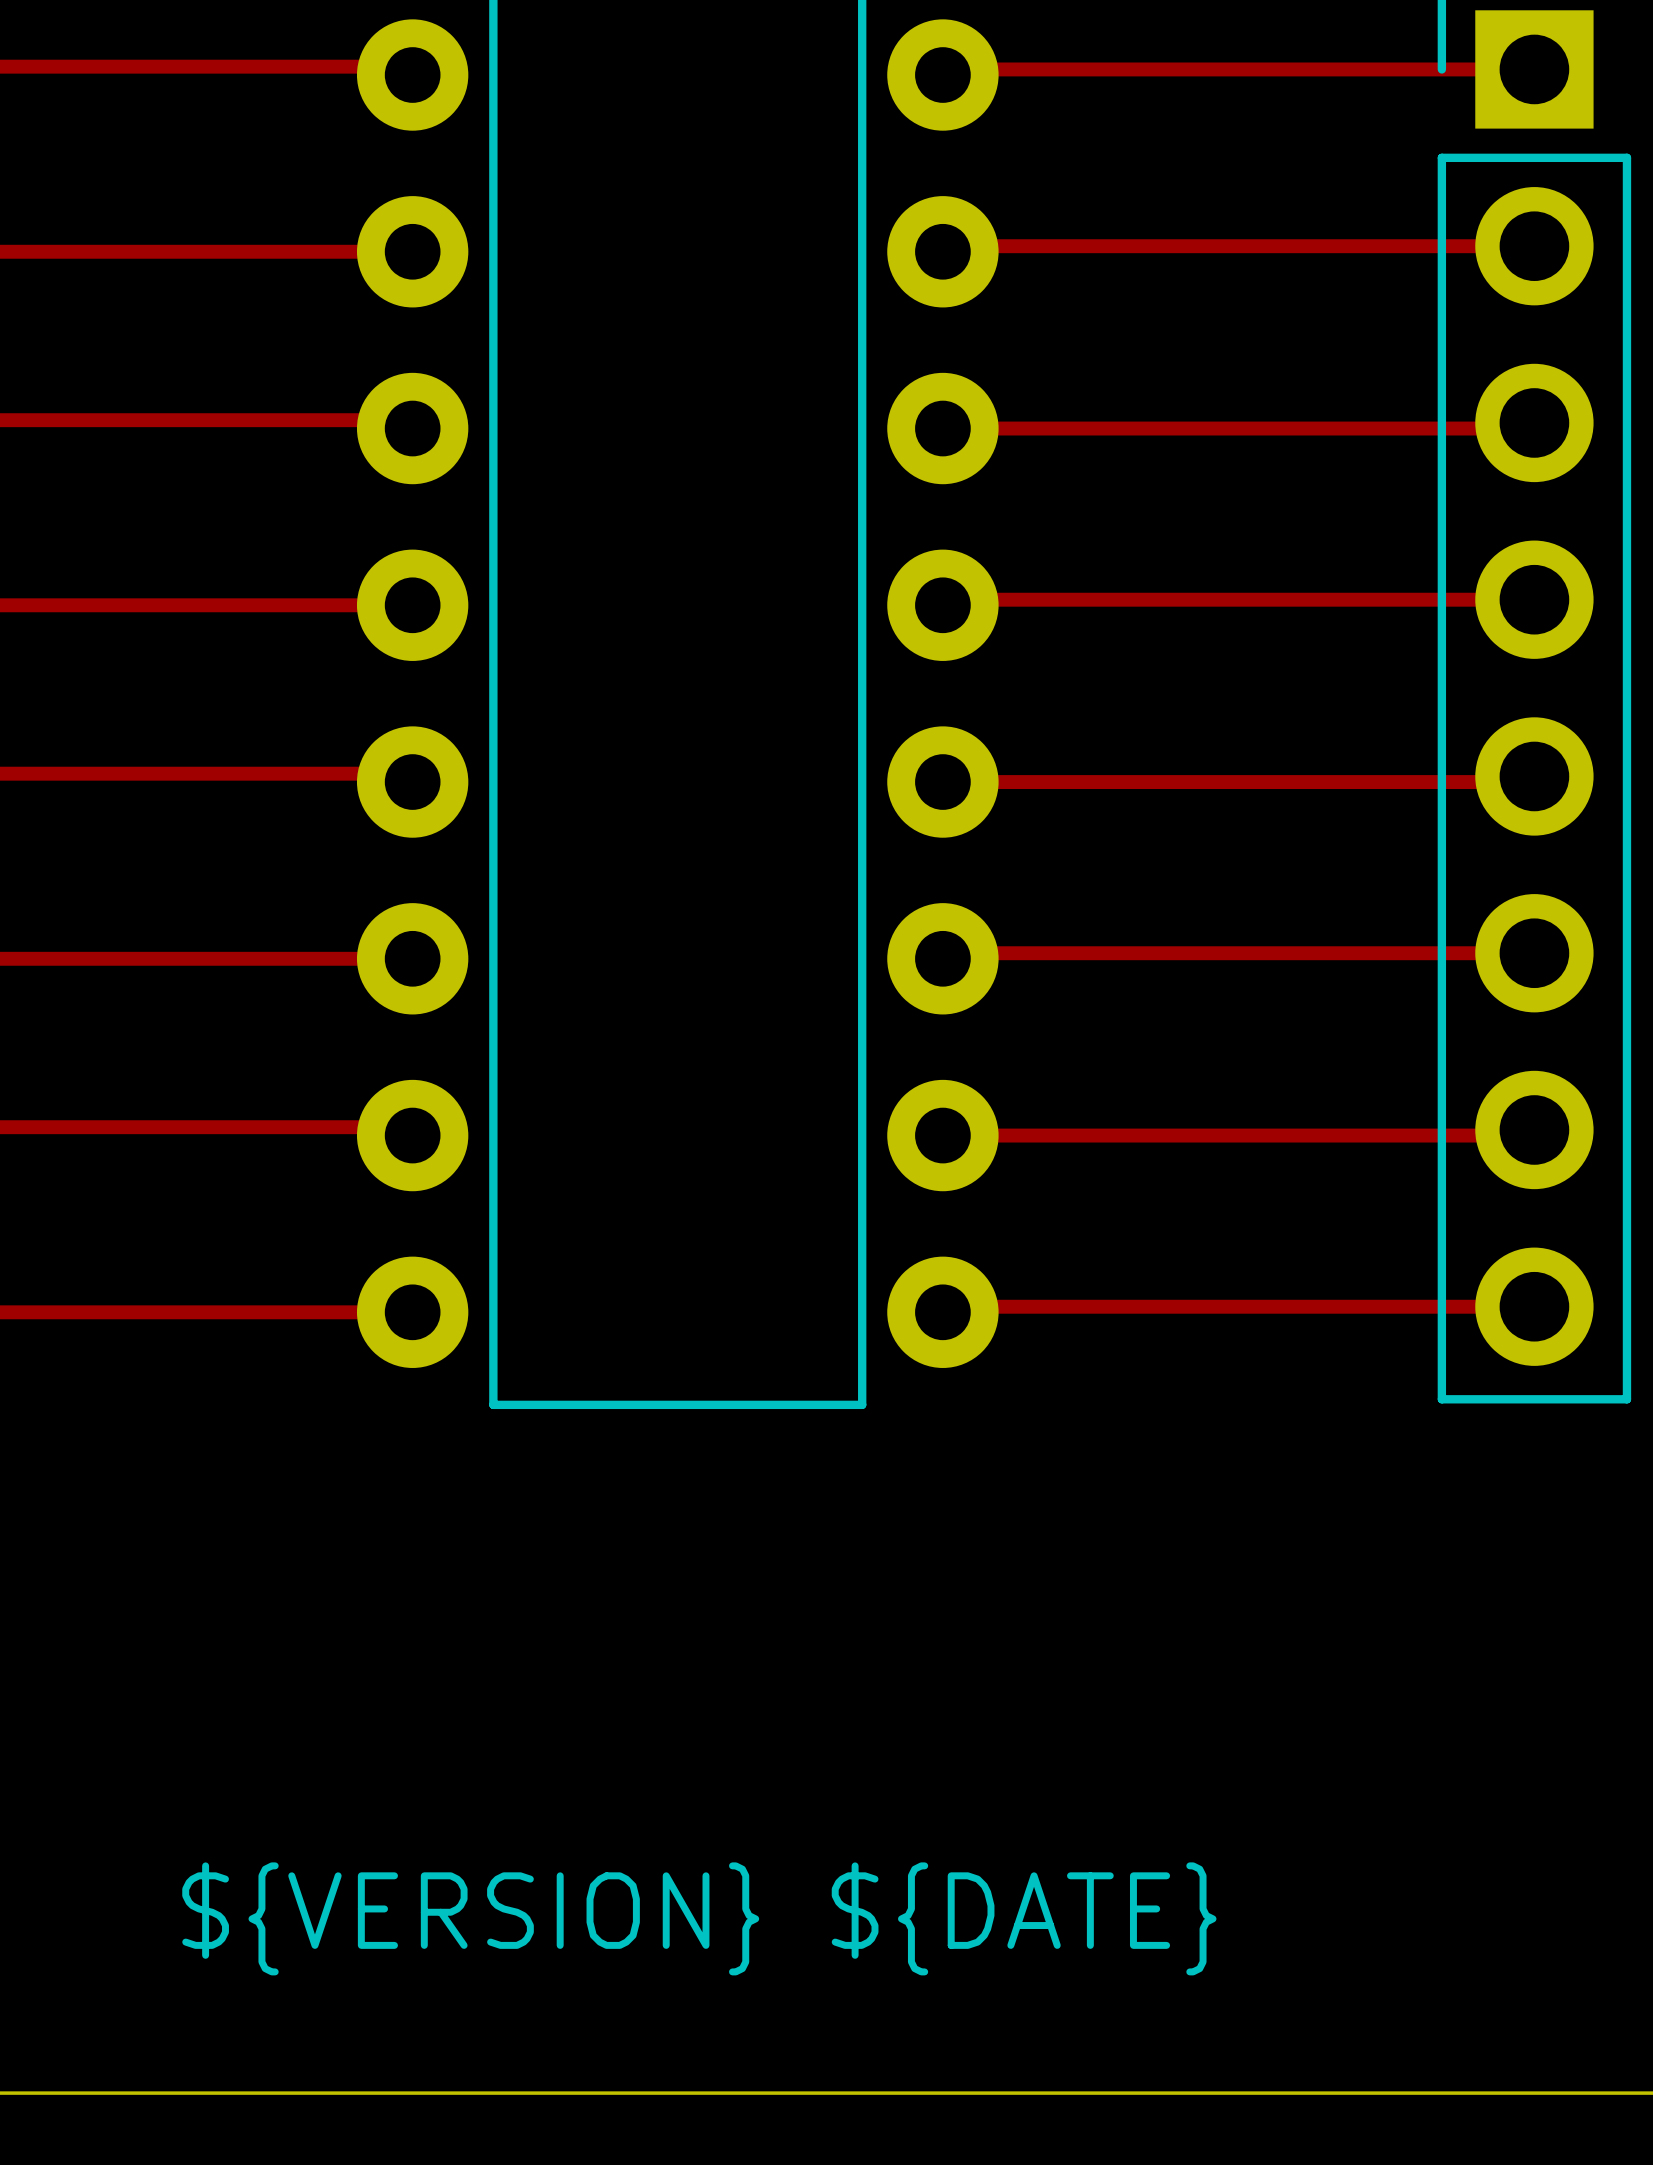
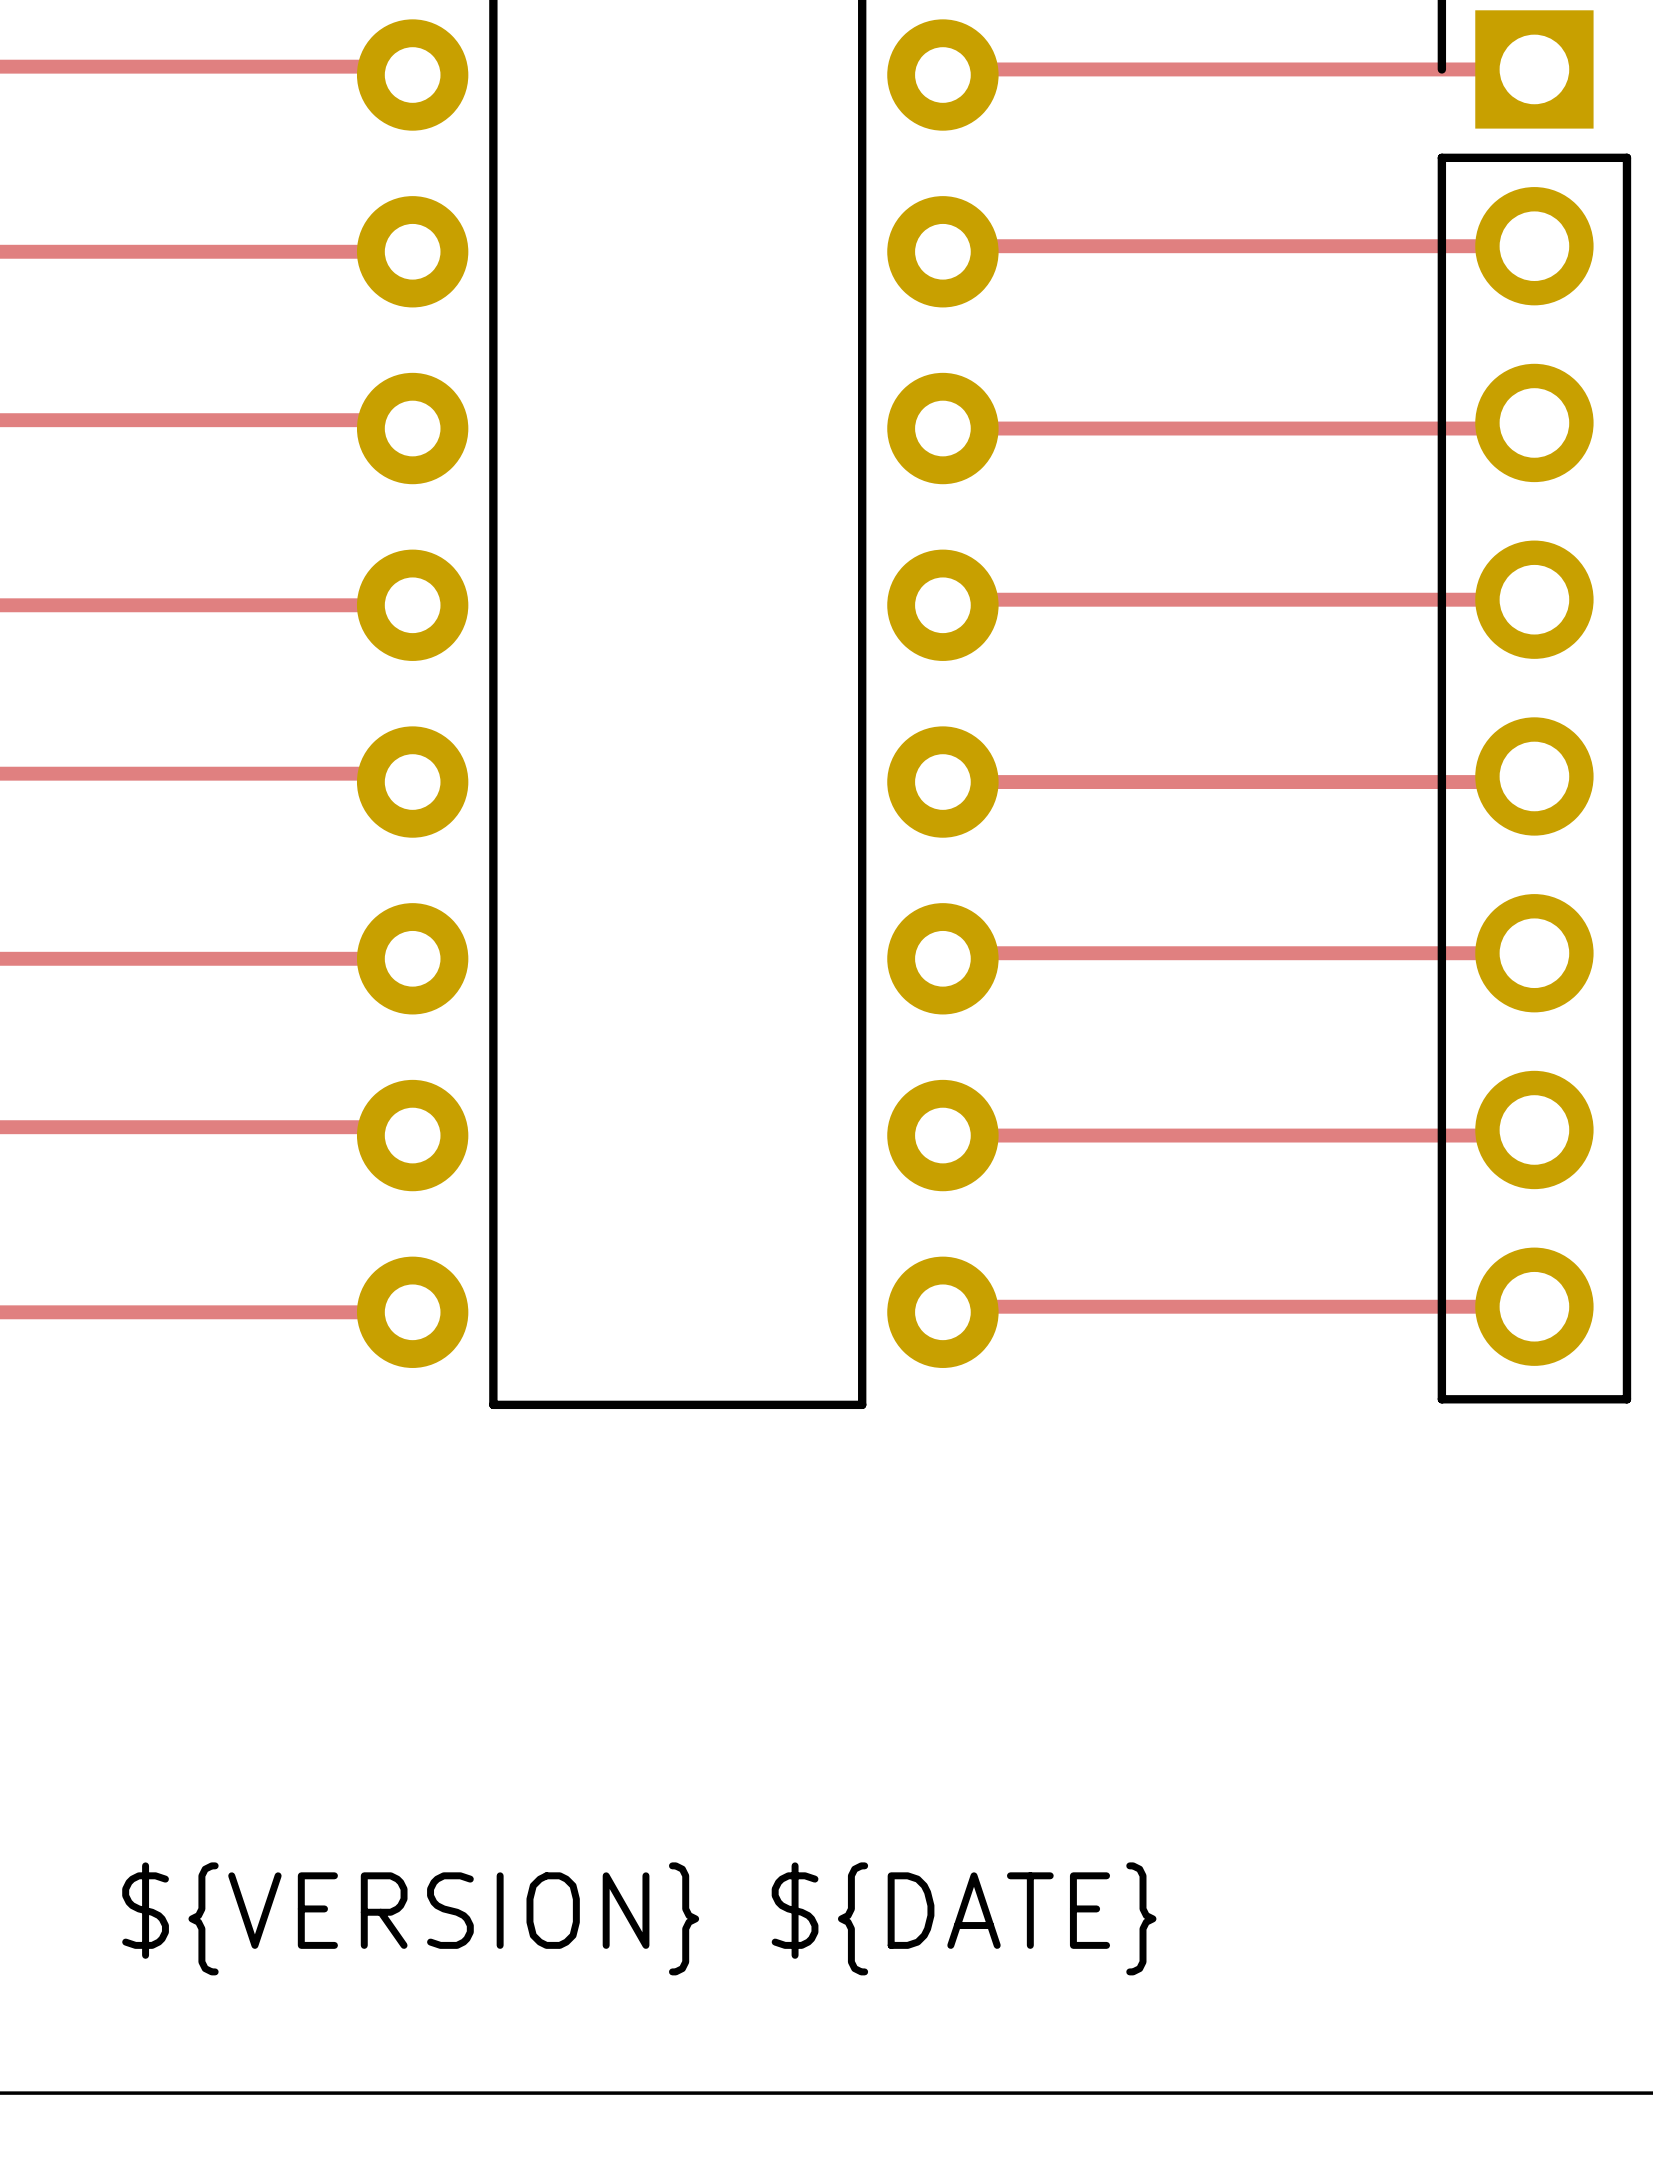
text position: ${VERSION} ${DATE} (699, 1918) -> ${VERSION} ${DATE} (639, 1918)

